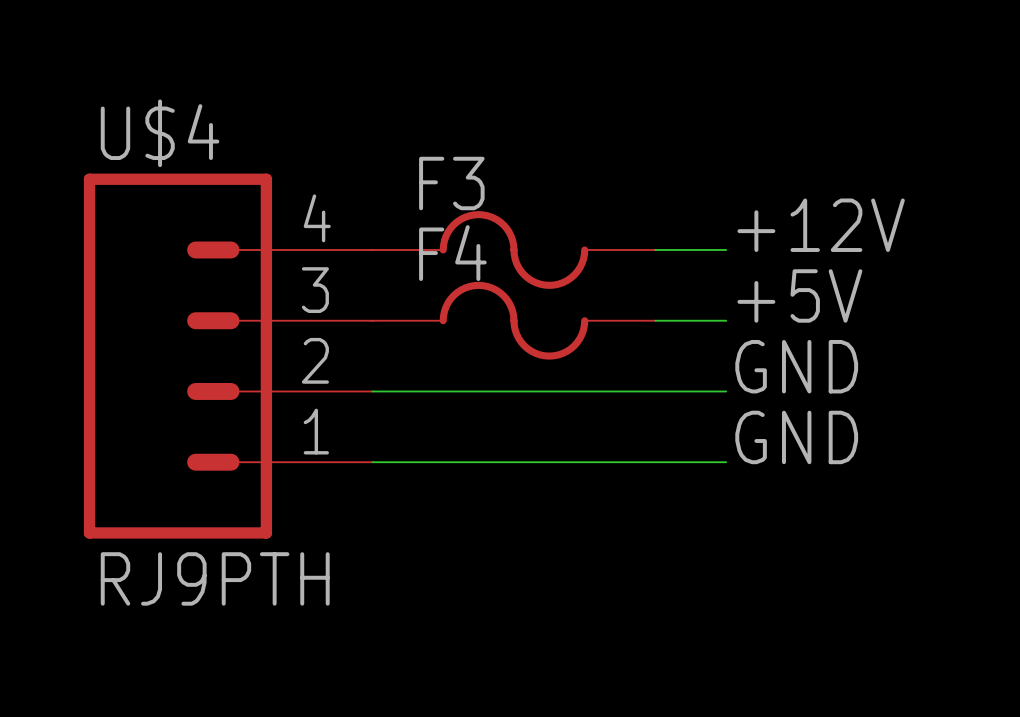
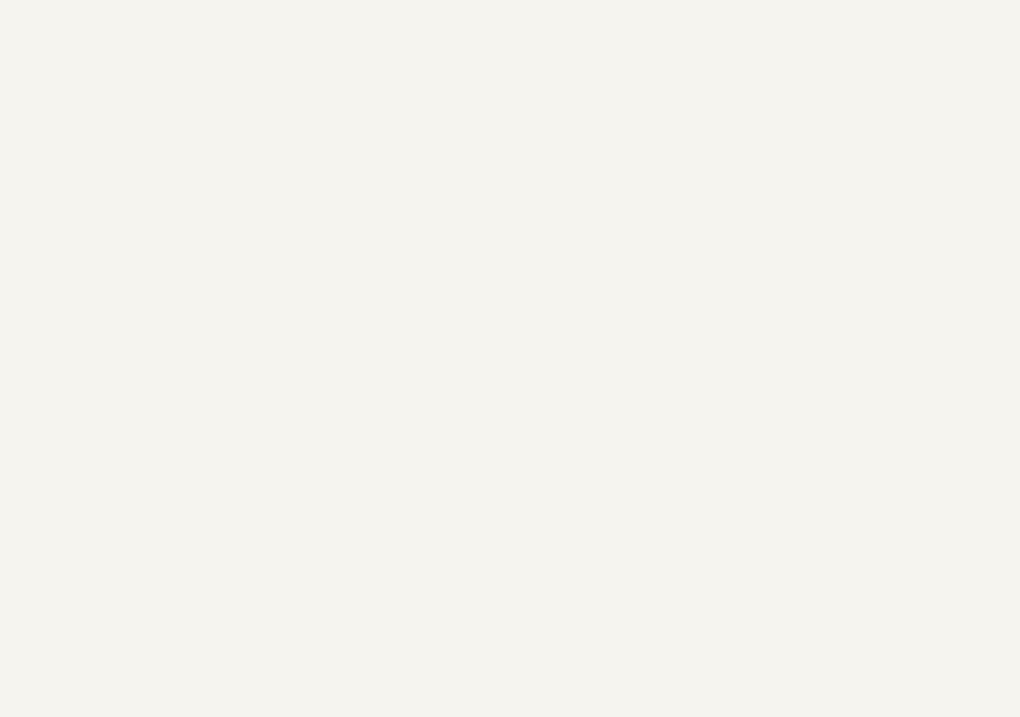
label: +12V (821, 225) -> none
F3: (513, 249) -> none
wire: (655, 249) (726, 249) -> none
label: +5V (799, 295) -> none
F4: (513, 320) -> none
wire: (655, 320) (726, 320) -> none
U$4: RJ9PTH (228, 356) -> none
label: GND (796, 366) -> none
wire: (372, 391) (726, 391) -> none
label: GND (796, 437) -> none
wire: (372, 462) (726, 462) -> none

